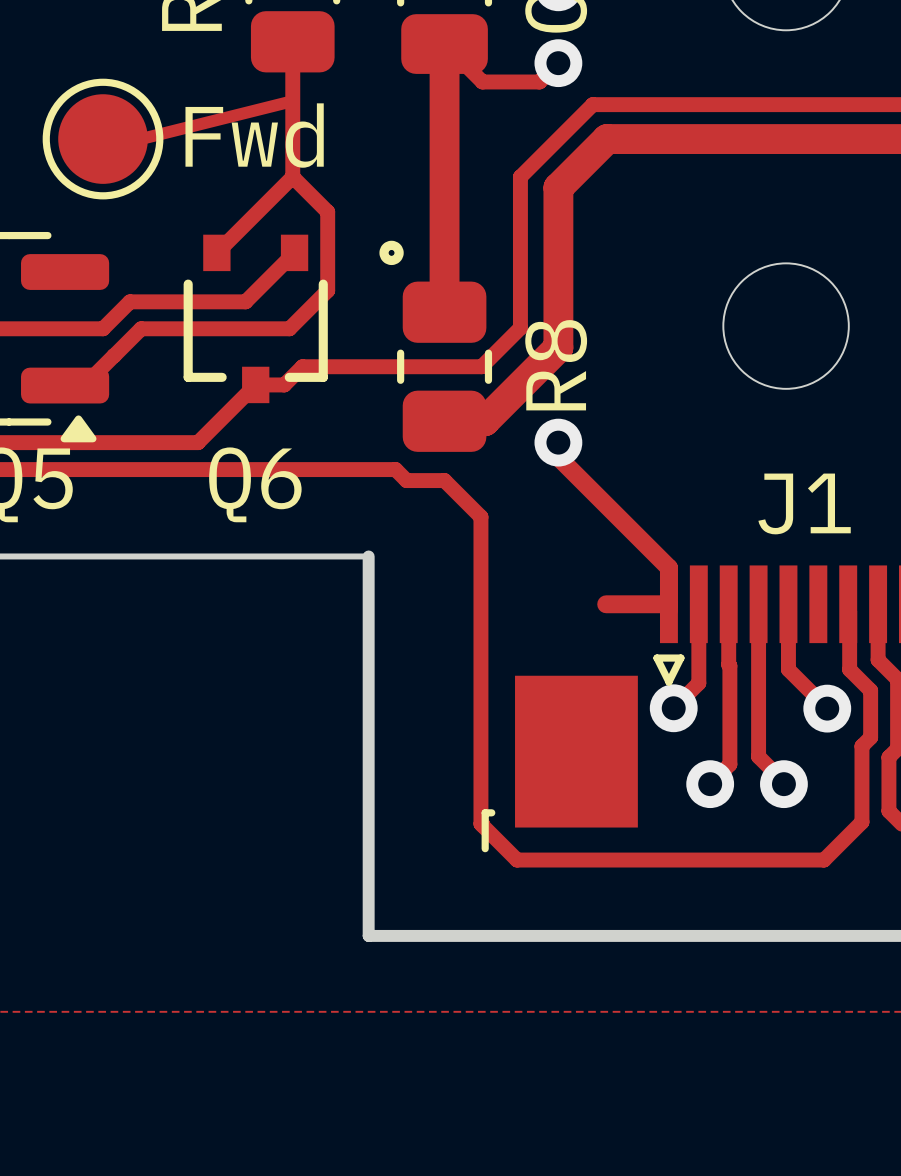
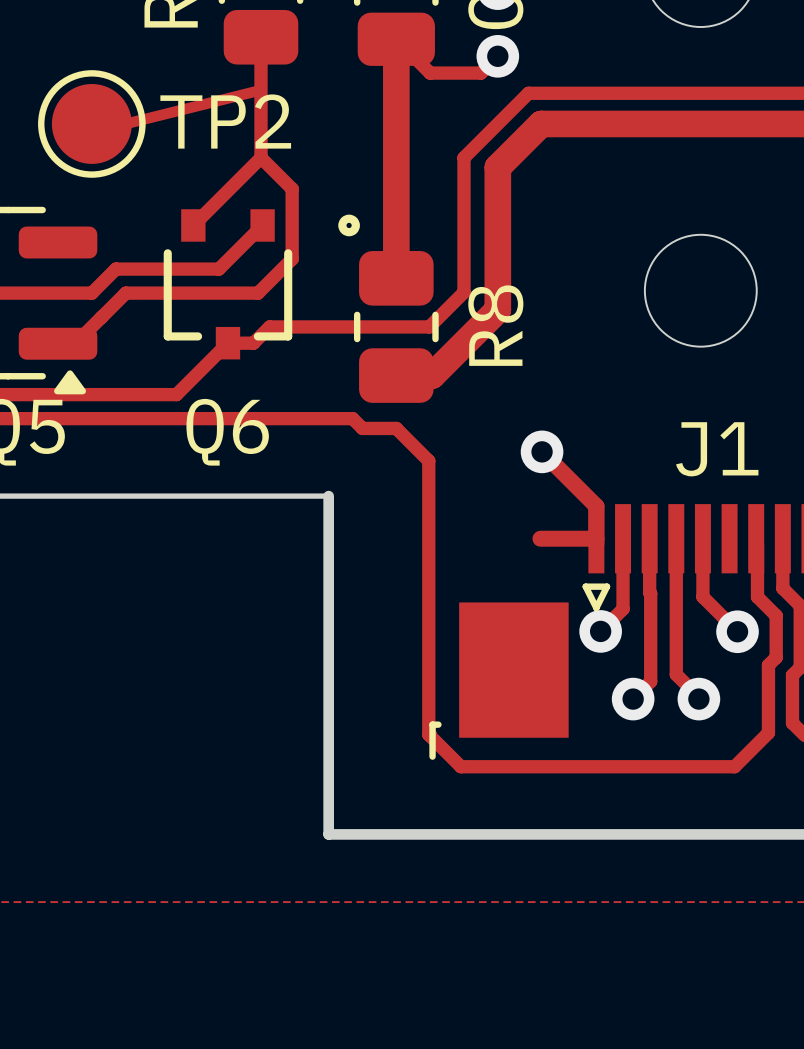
TP2 value: Fwd (254, 135) -> none
TP2 name: none -> TP2 (225, 121)
track: (558, 442) (558, 457) (608, 506) -> none
via position: (558, 442) -> (542, 451)

